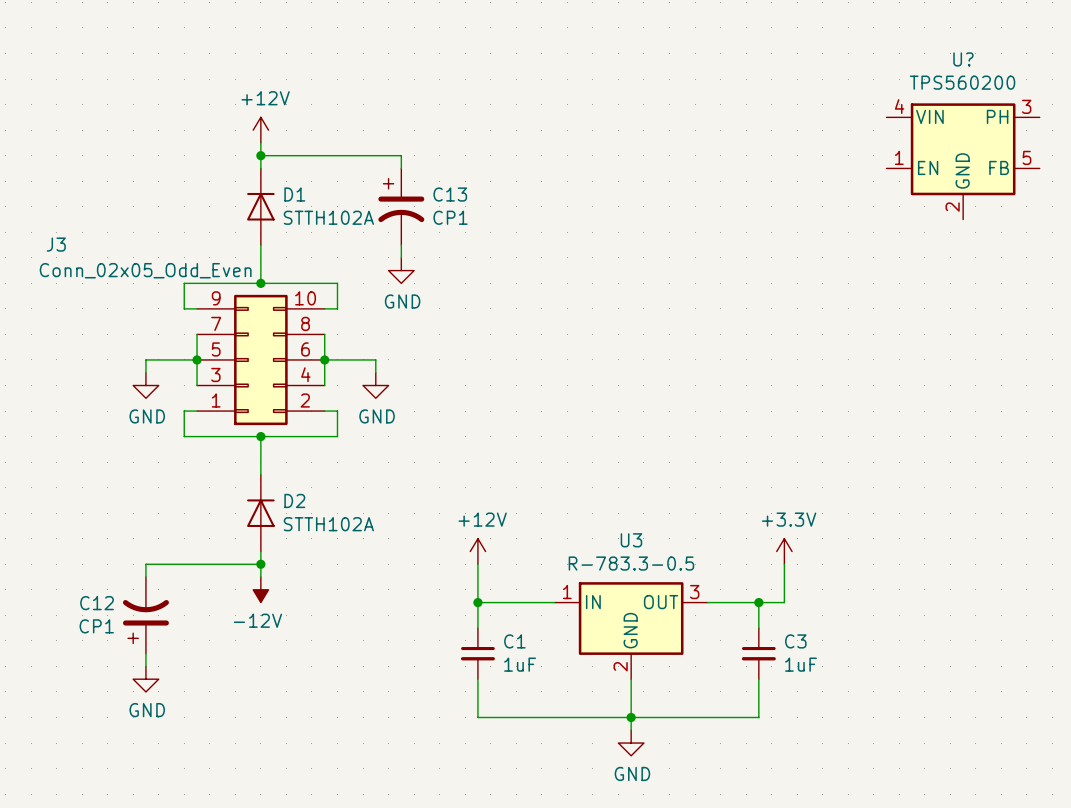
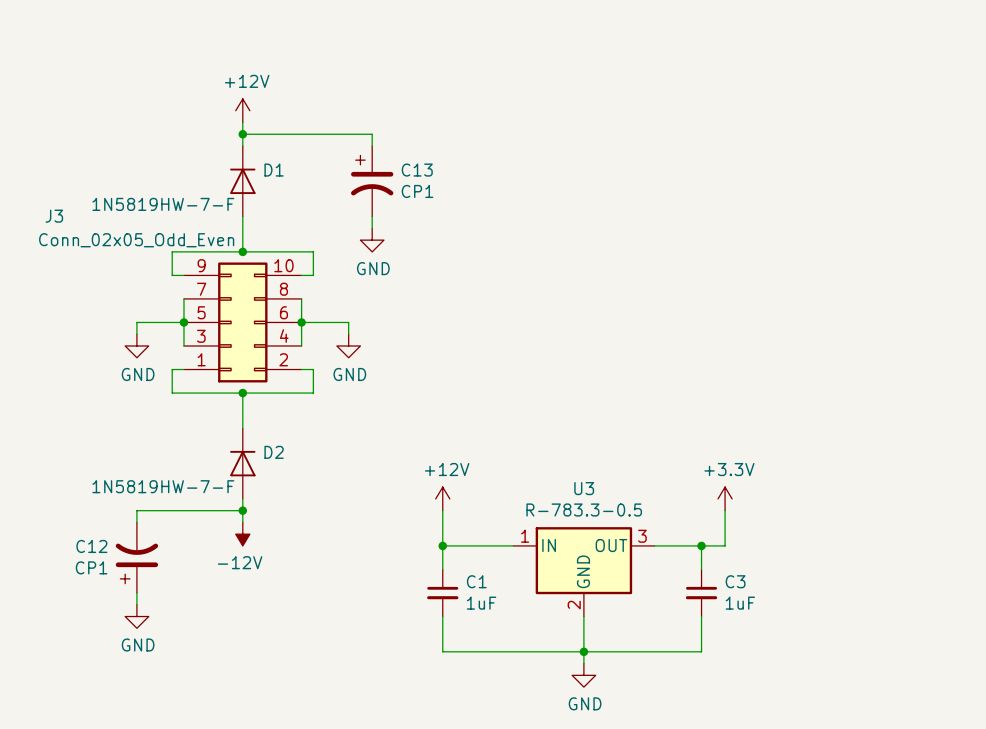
U?: TPS560200 (963, 161) -> none
D1 value: STTH102A (328, 217) -> 1N5819HW-7-F (163, 204)
D2 value: STTH102A (328, 524) -> 1N5819HW-7-F (163, 486)

